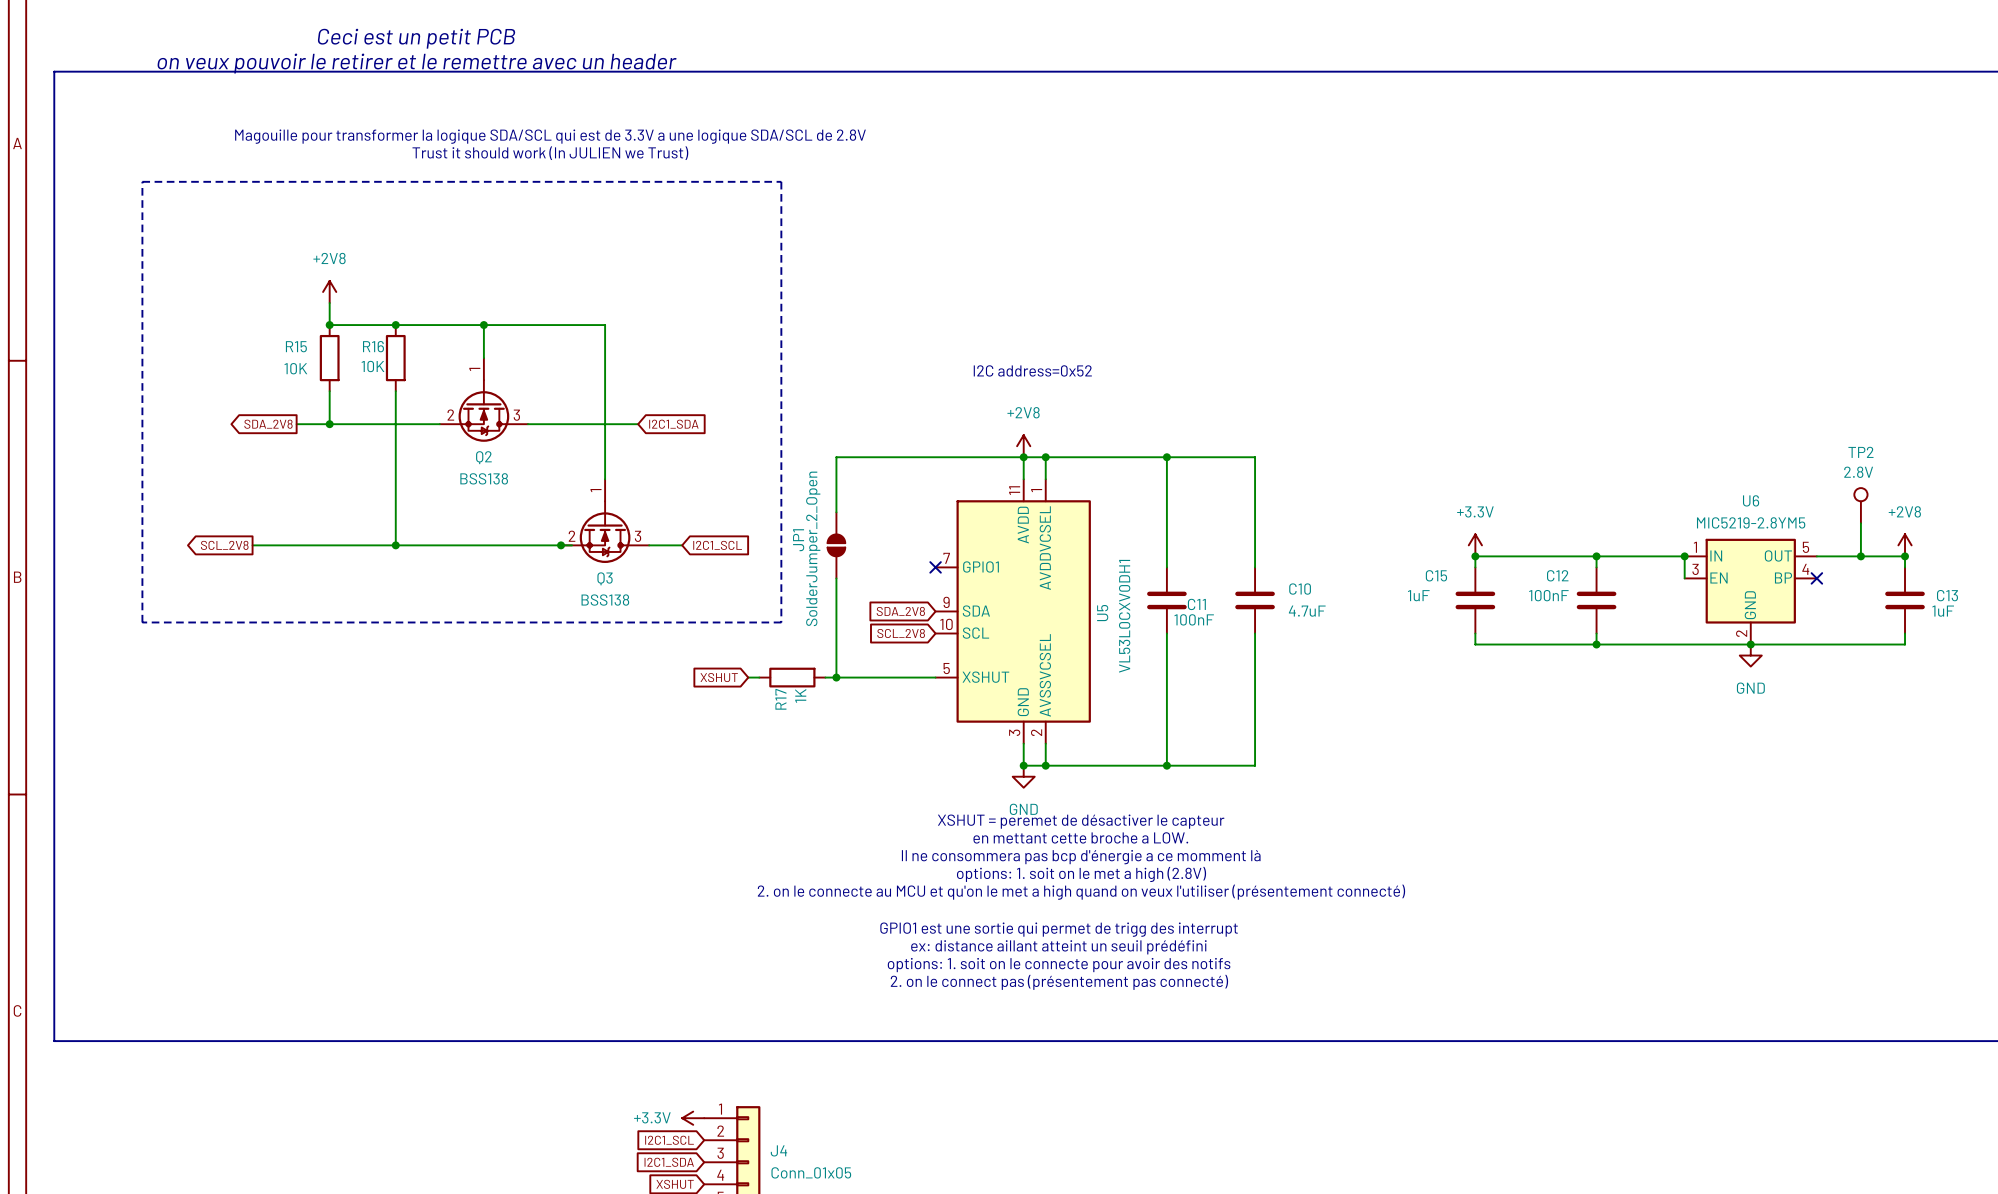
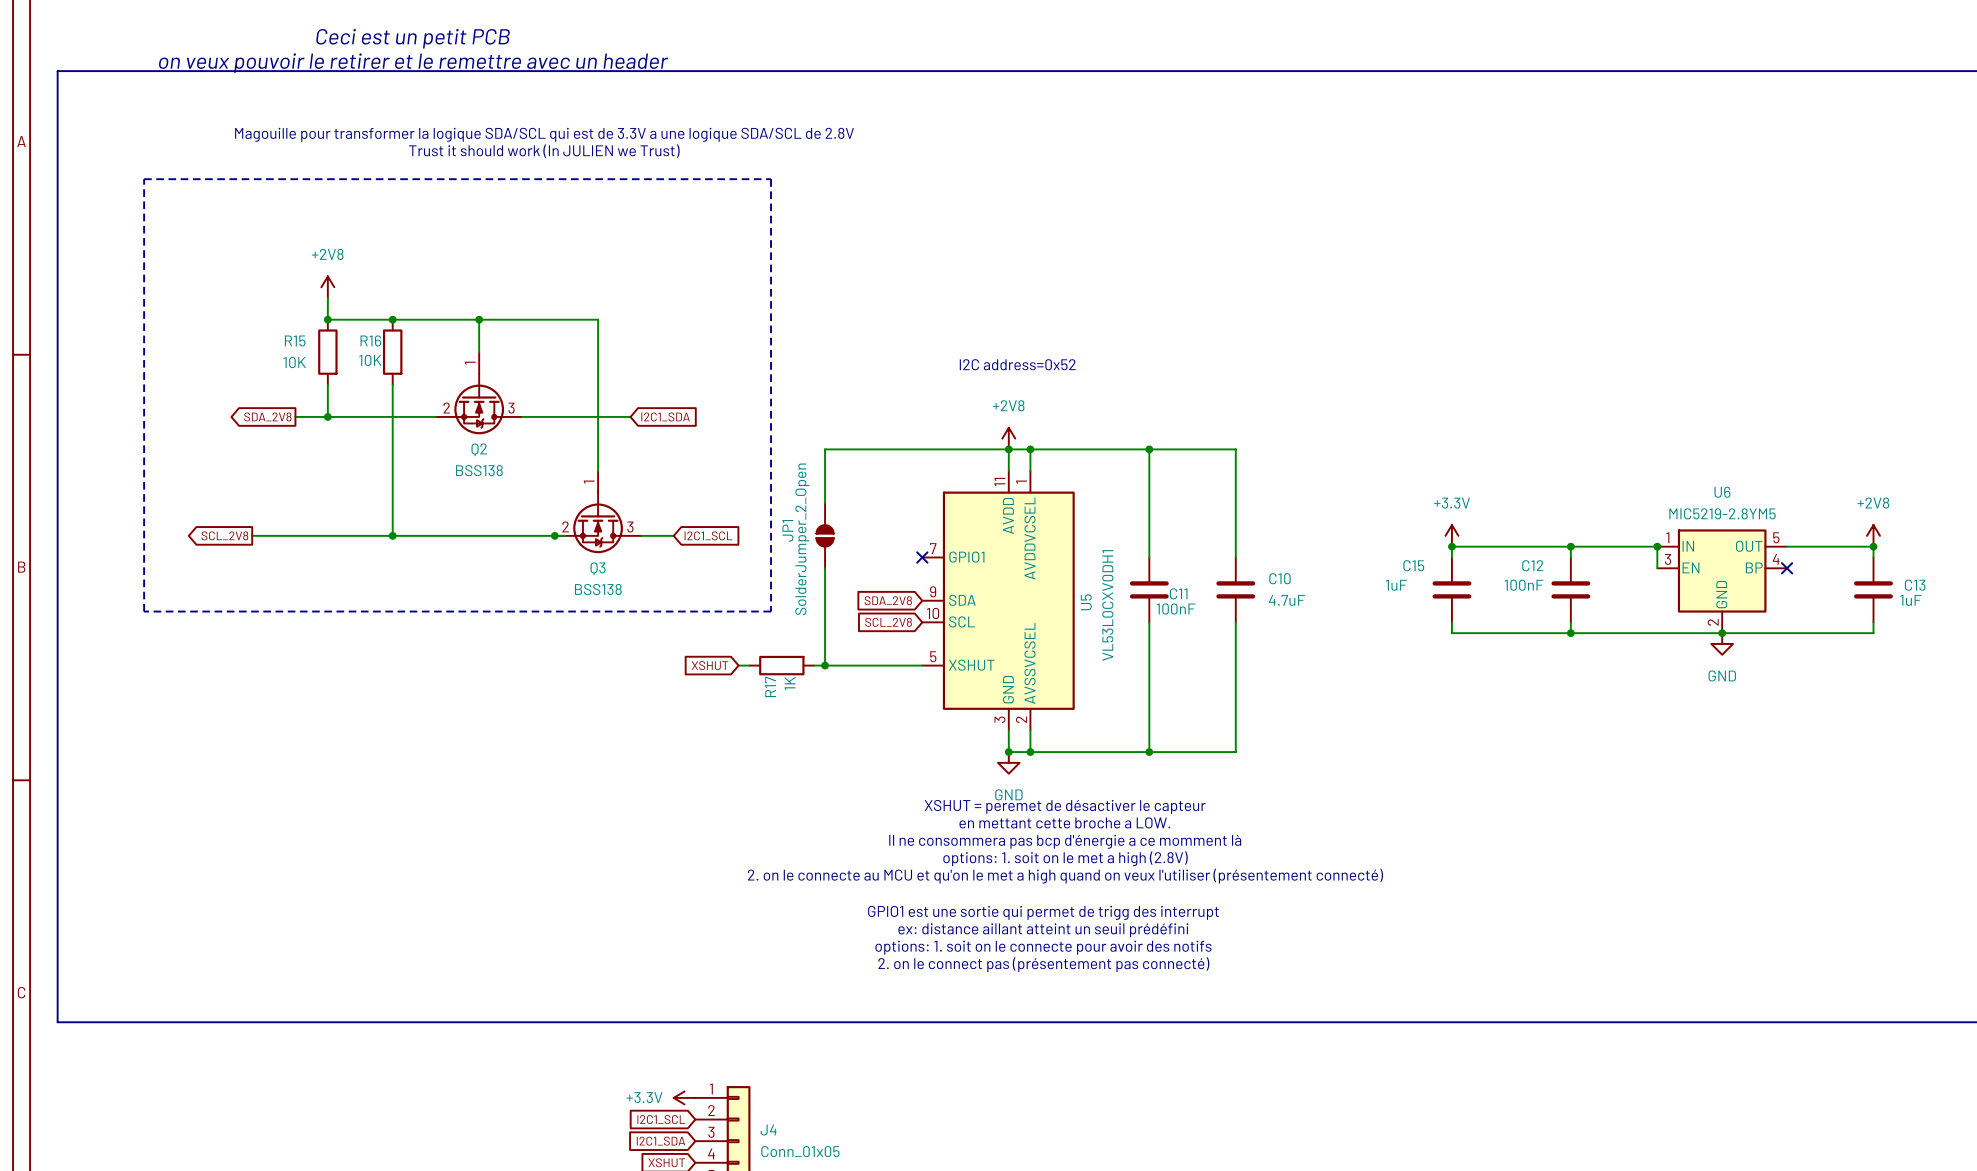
TP2: 2.8V (1860, 505) -> none
wire: (1860, 523) (1860, 556) -> none
junction: (1860, 556) -> none

